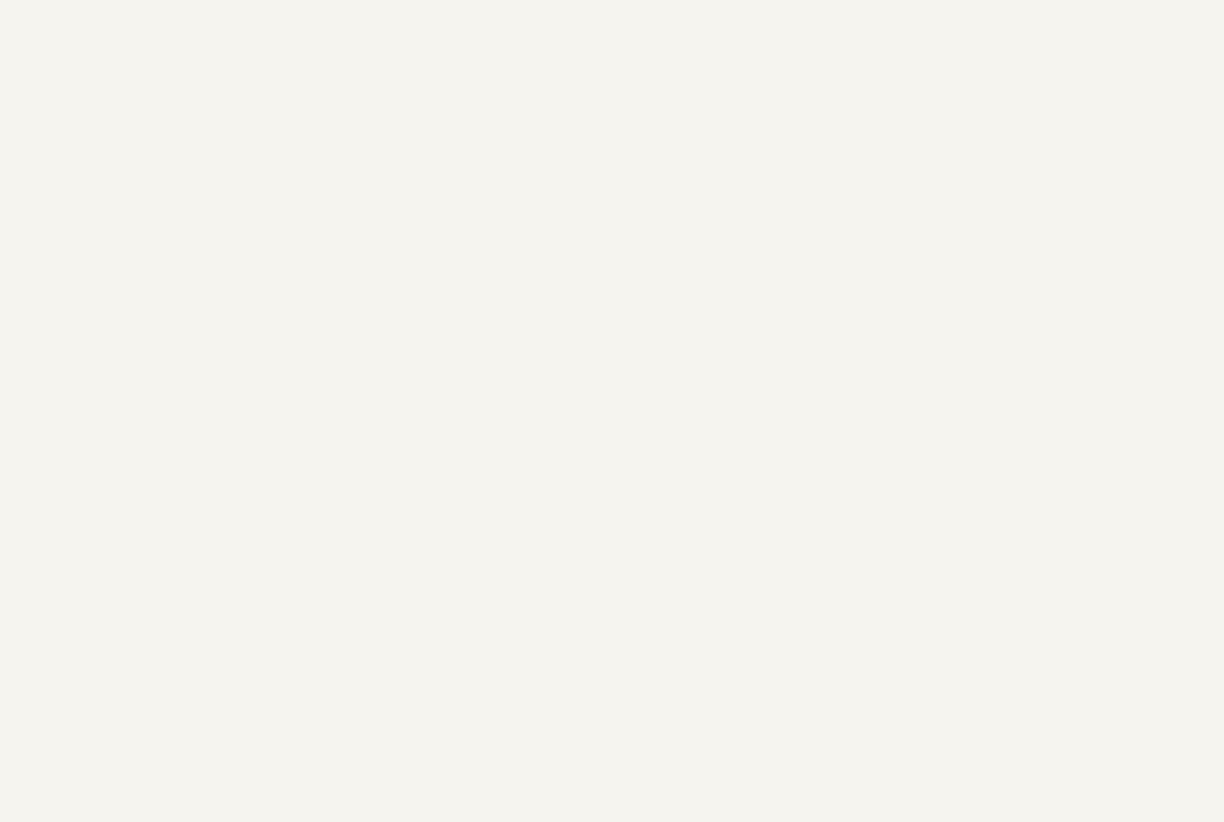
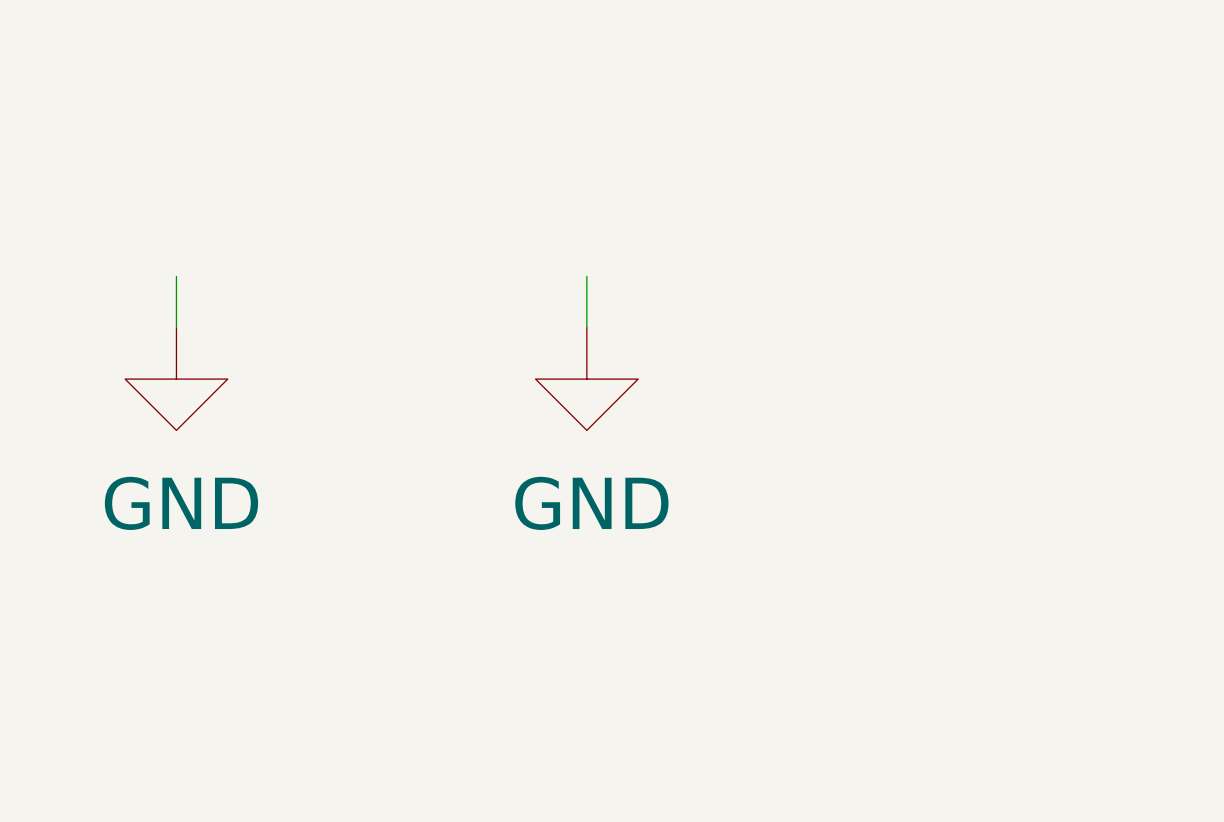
wire: none -> (176, 276) (176, 327)
wire: none -> (586, 276) (586, 327)
power symbol: none -> GND (176, 379)
power symbol: none -> GND (586, 379)

